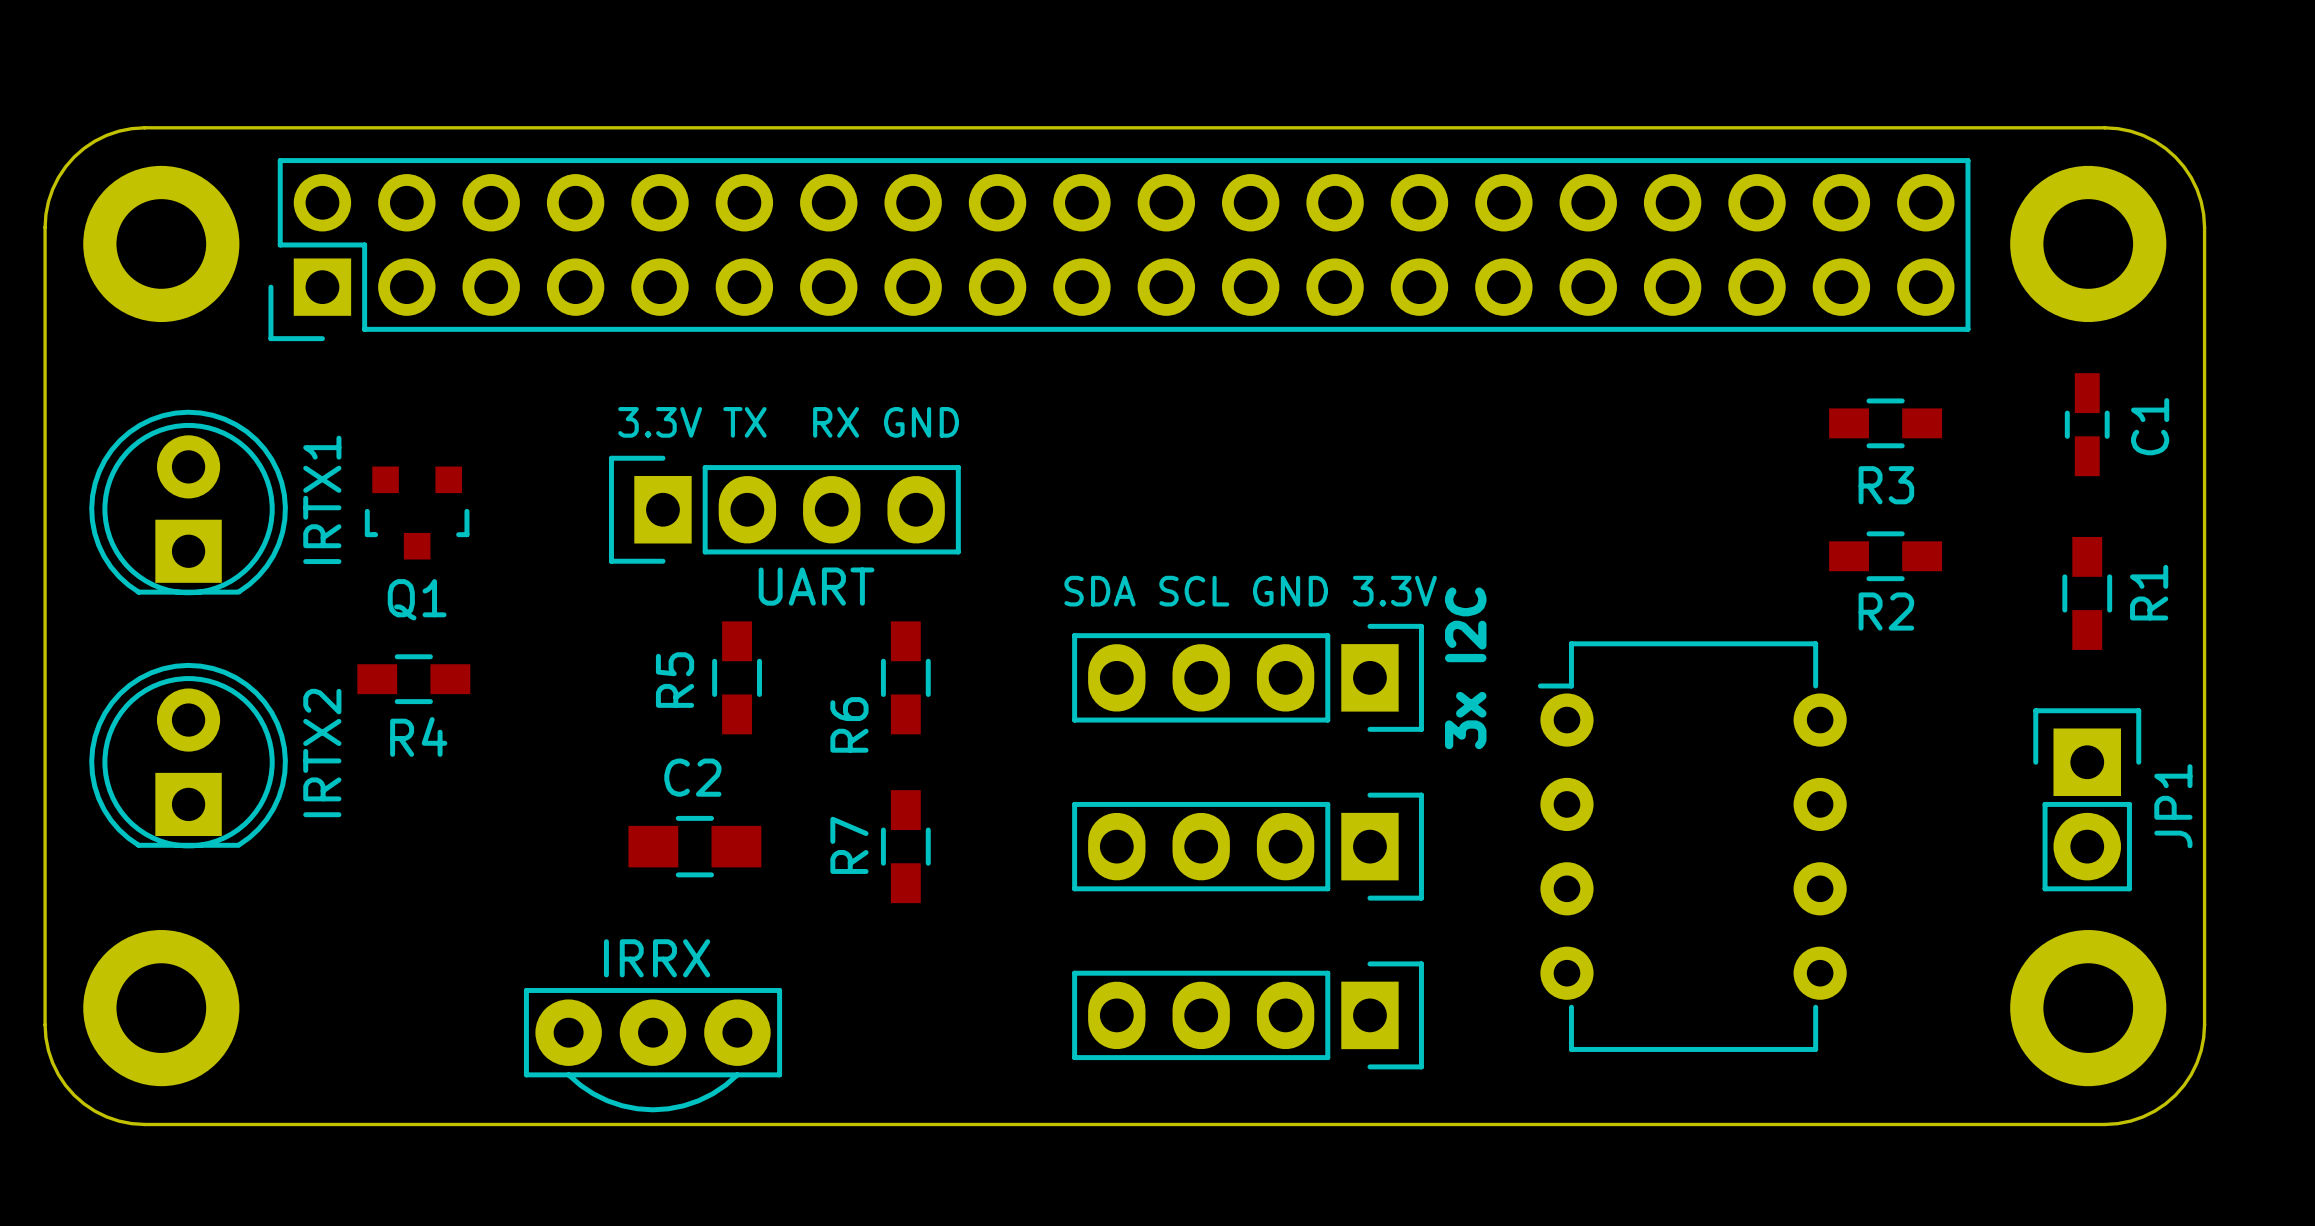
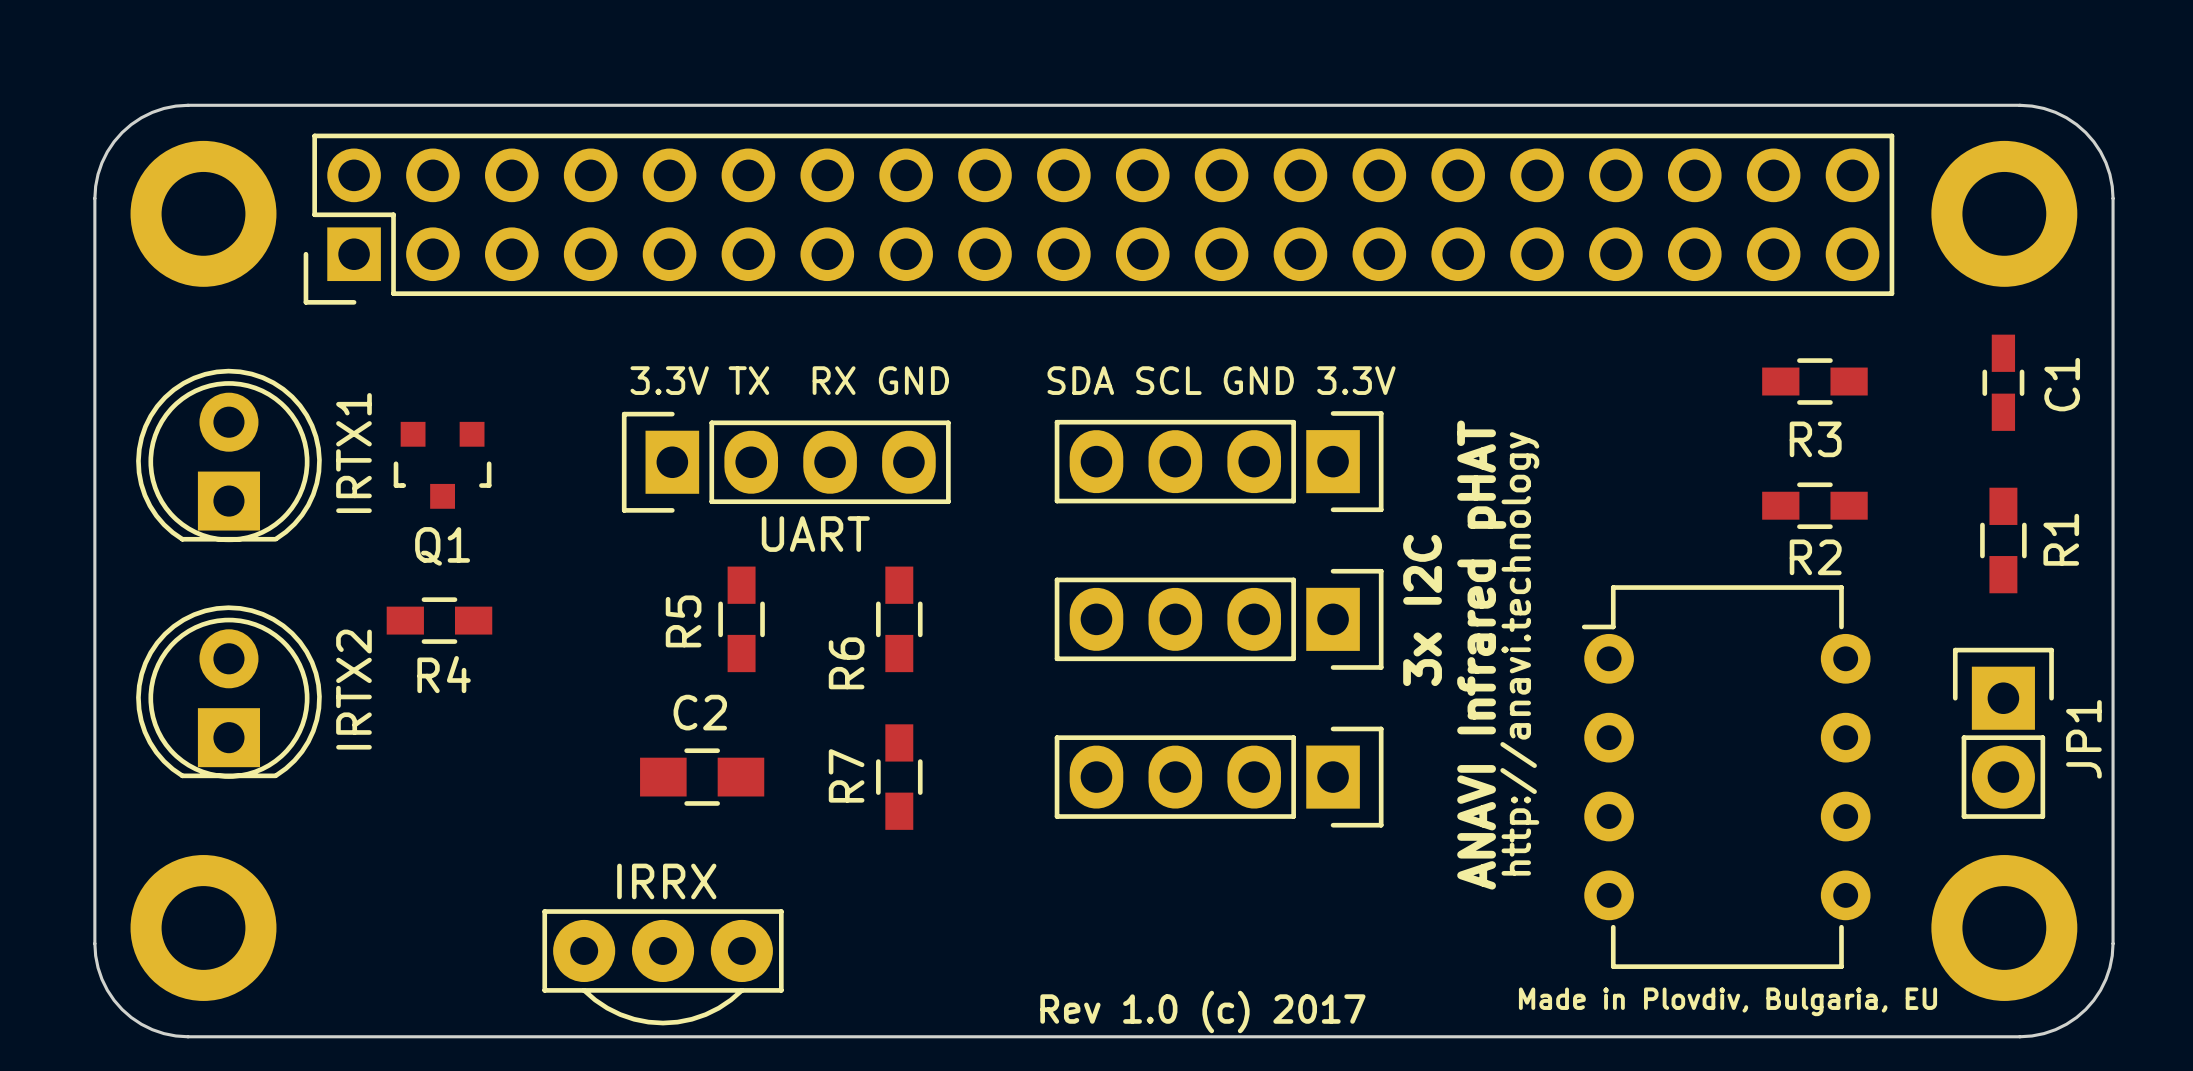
text position: SDA SCL GND 3.3V (1250, 591) -> SDA SCL GND 3.3V (1221, 380)
text: none -> http://anavi.technology (1519, 653)
text: none -> ANAVI Infrared pHAT (1481, 655)
part position: (1692, 846) -> (1726, 777)
part position: (1248, 1015) -> (1219, 461)
text: none -> Made in Plovdiv, Bulgaria, EU (1728, 1001)
text: none -> Rev 1.0 (c) 2017 (1202, 1011)

